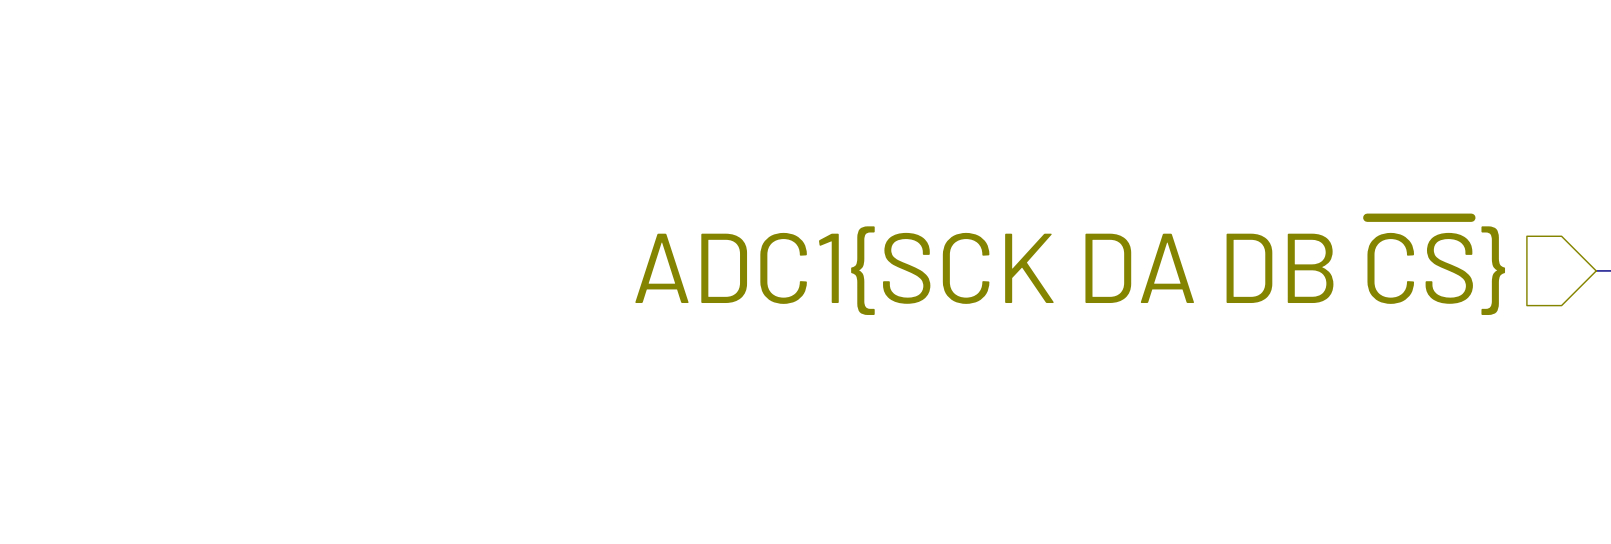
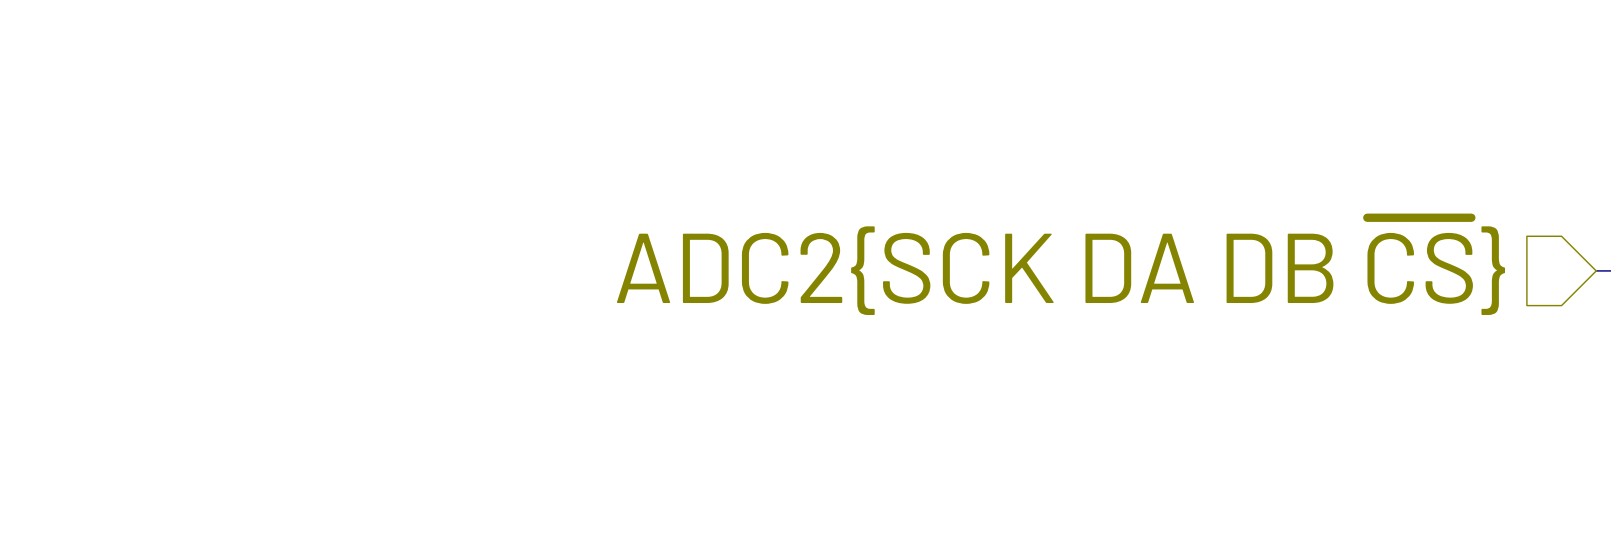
hierarchical label: ADC1{SCK DA DB ~{CS}} (1070, 266) -> ADC2{SCK DA DB ~{CS}} (1060, 266)

